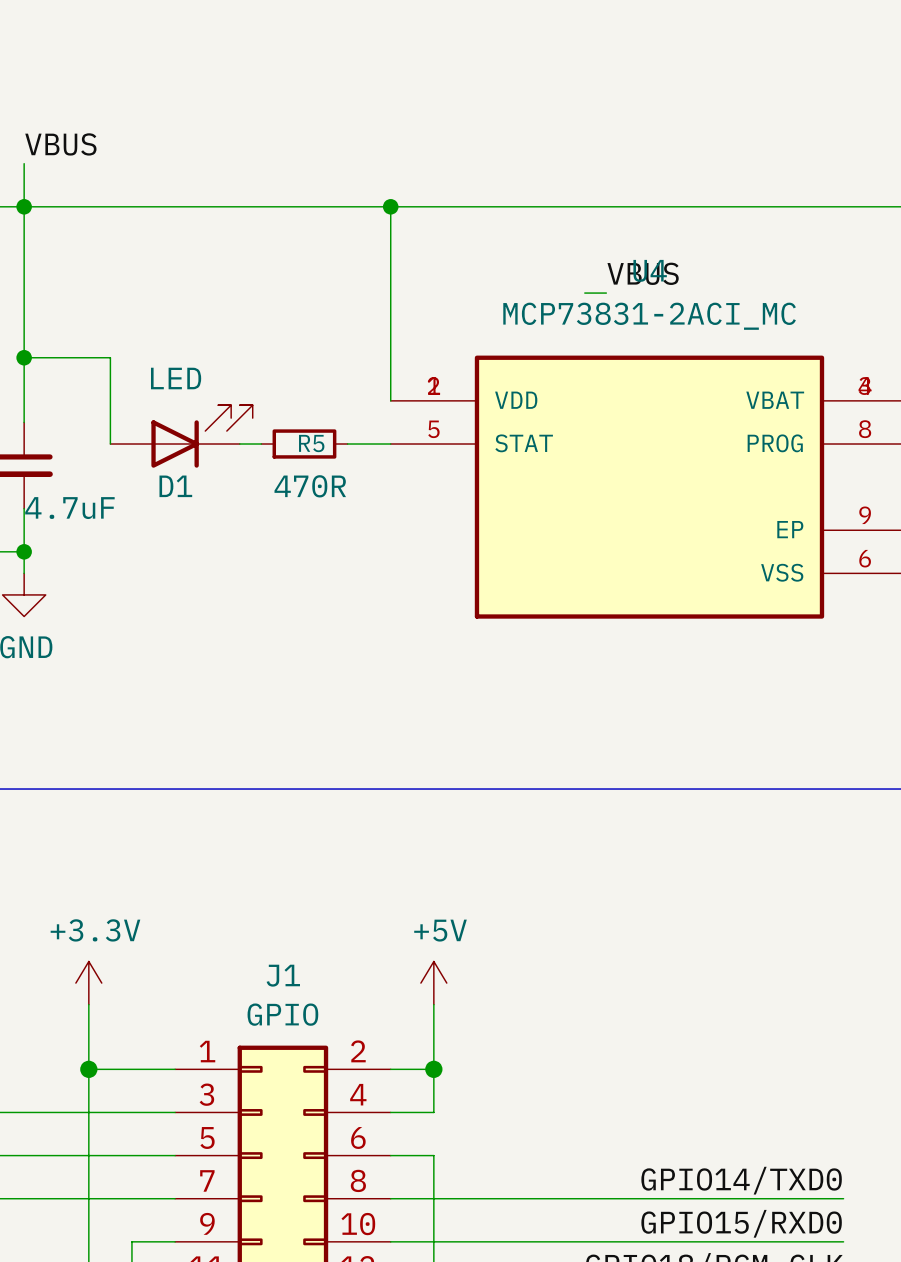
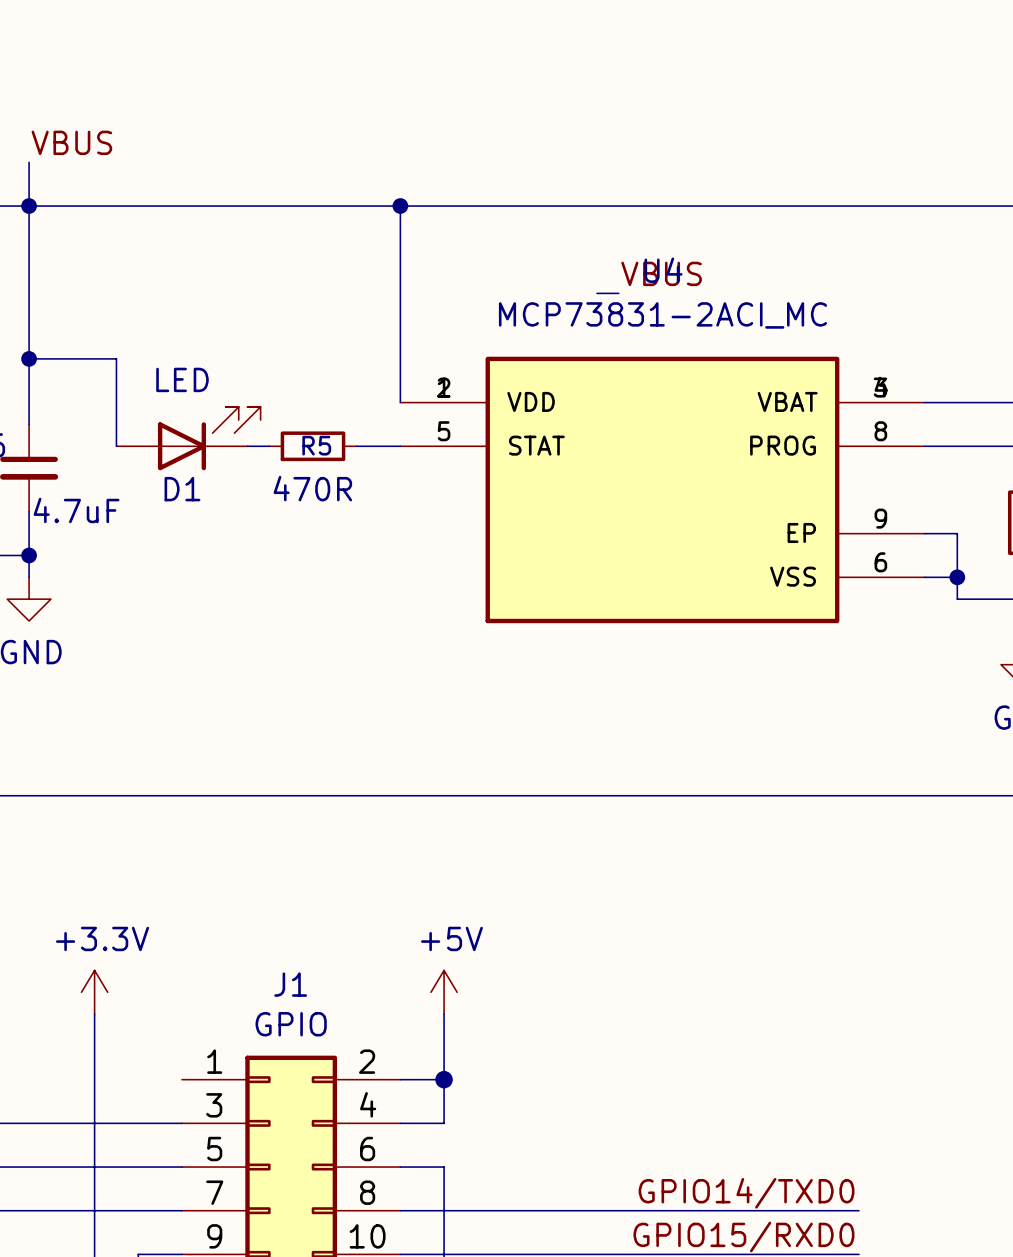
wire: (88, 1069) (175, 1069) -> none
junction: (88, 1069) -> none

